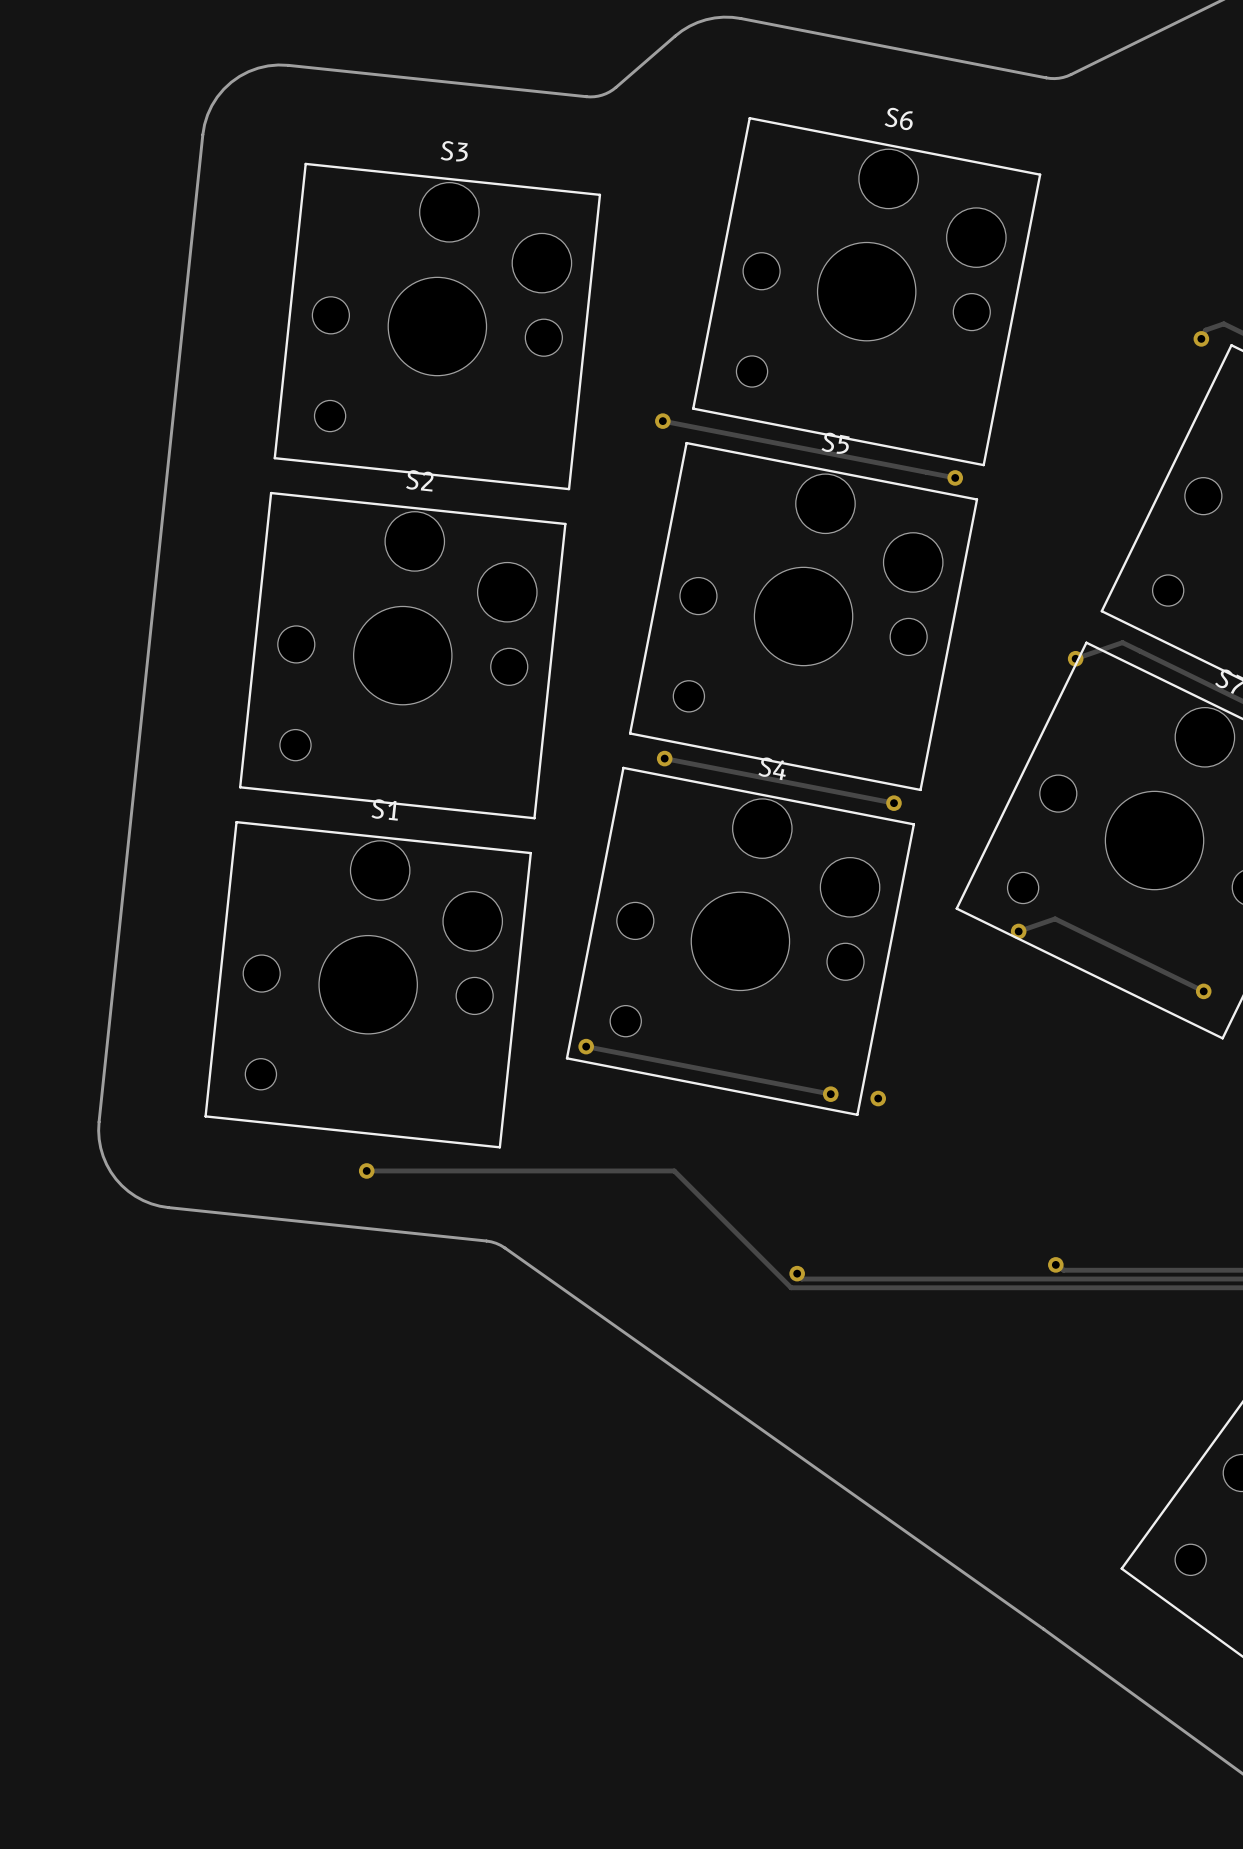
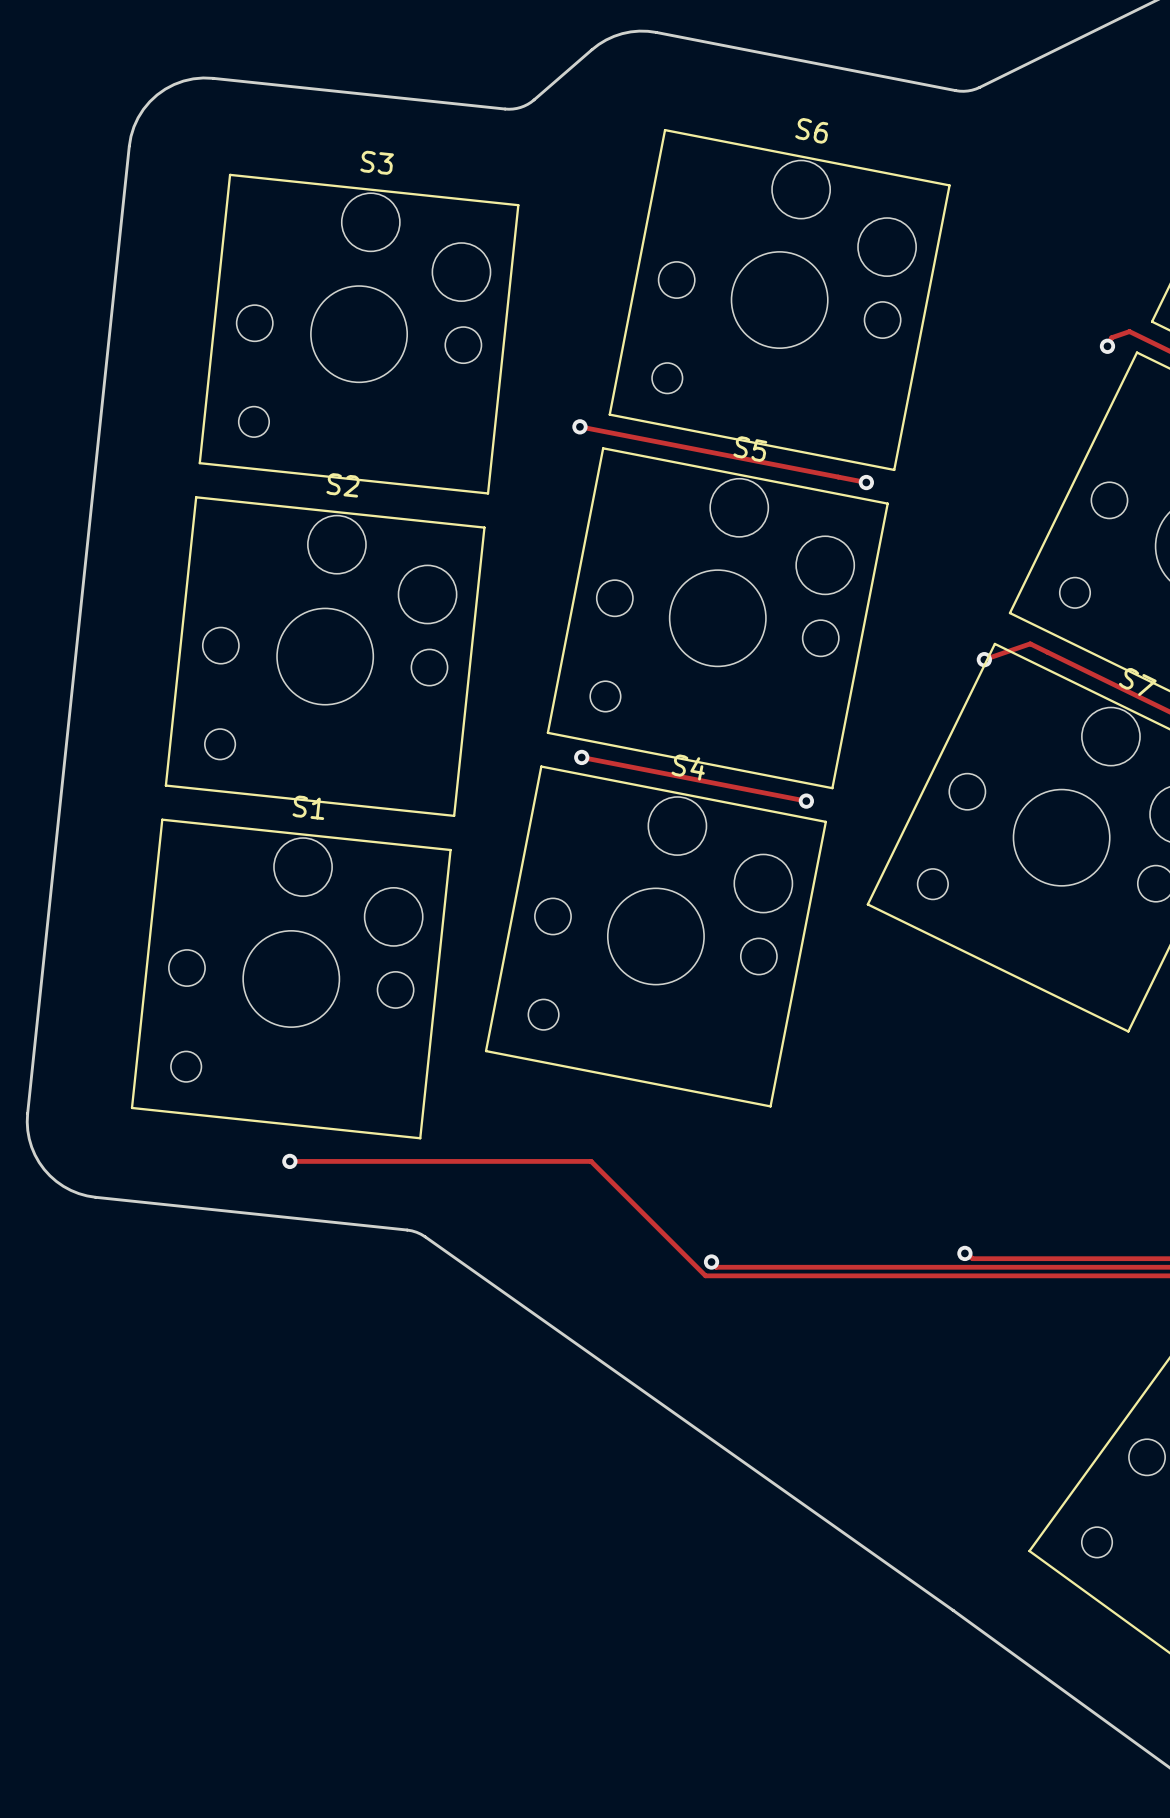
track: (1018, 931) (1055, 918) (1203, 991) -> none
via: (1018, 931) -> none
via: (1203, 991) -> none
track: (586, 1046) (830, 1094) -> none
via: (586, 1046) -> none
via: (830, 1094) -> none
via: (878, 1098) -> none

